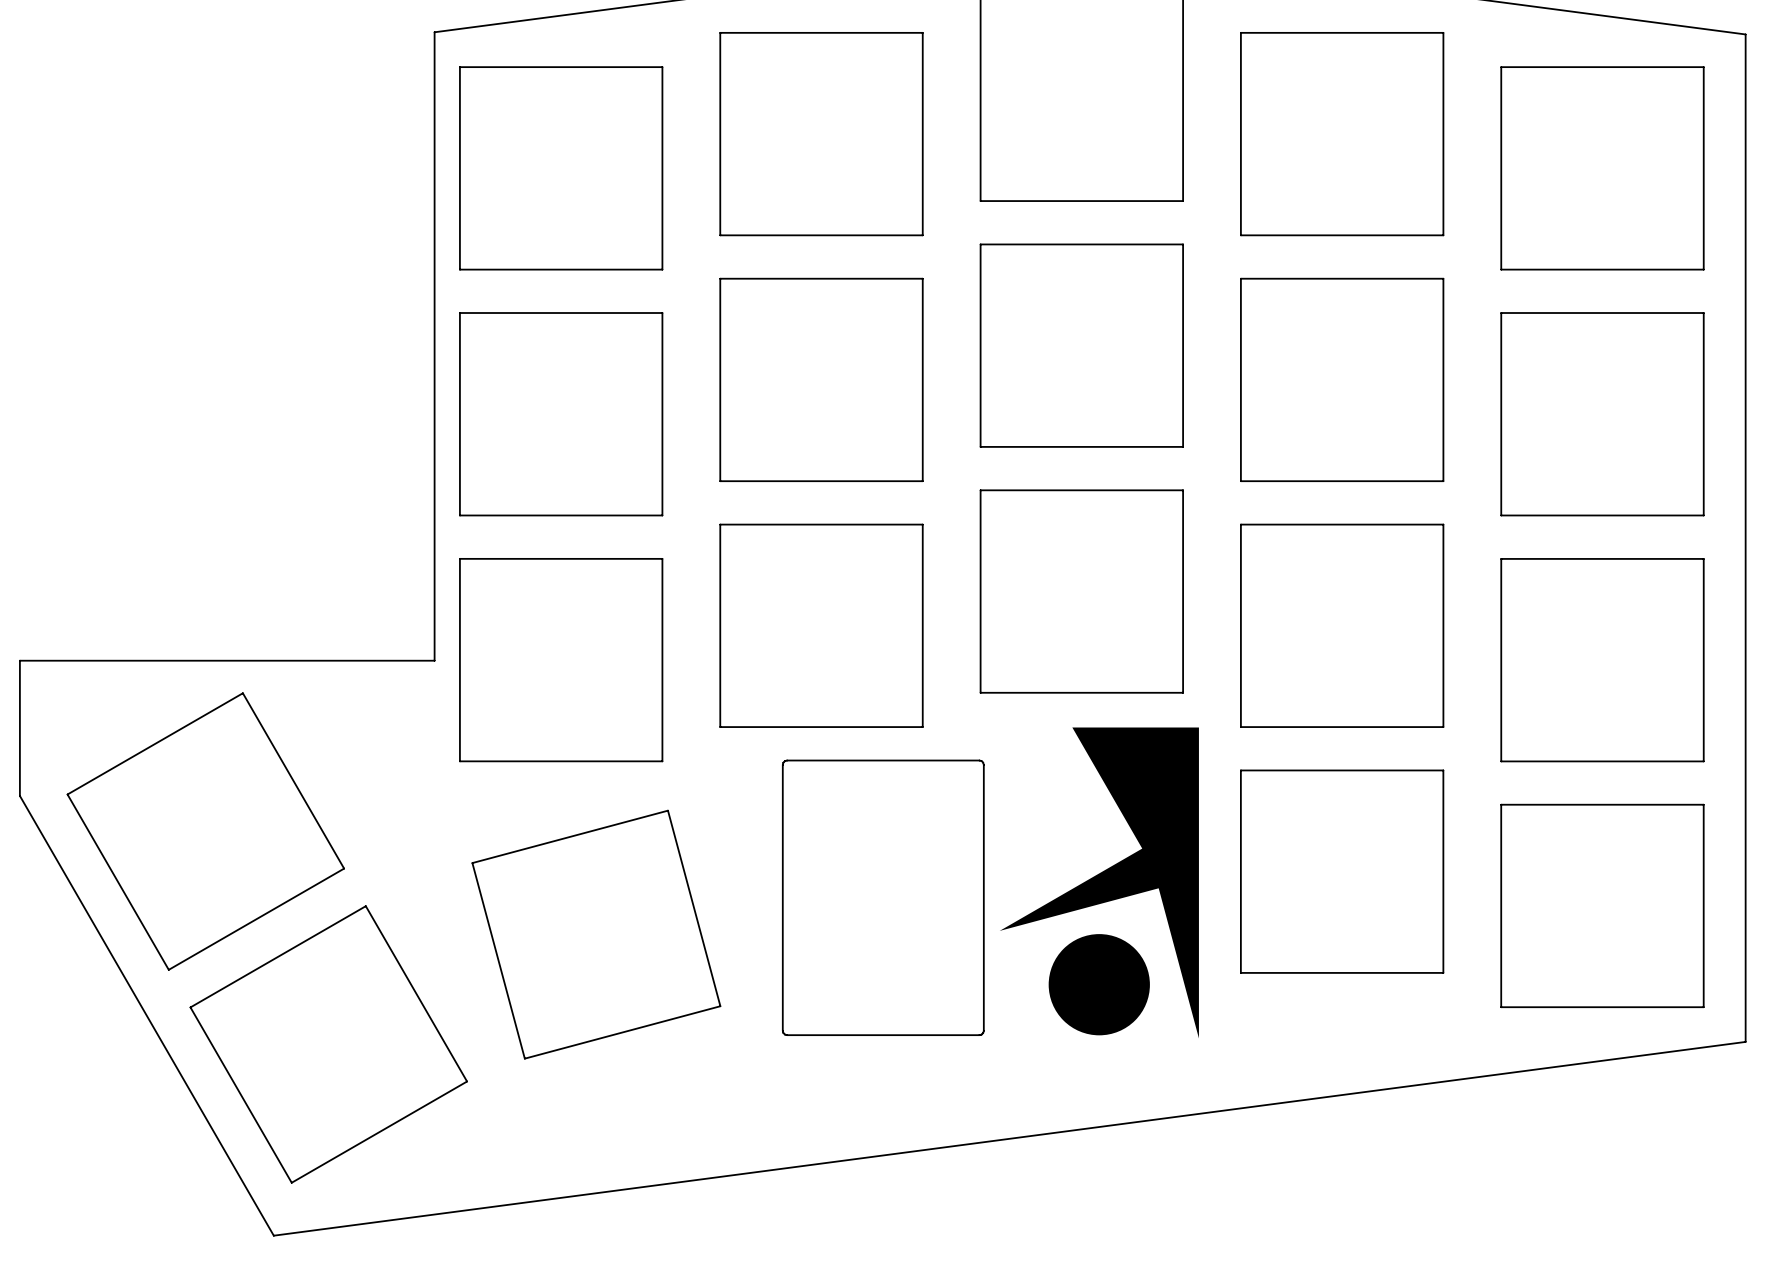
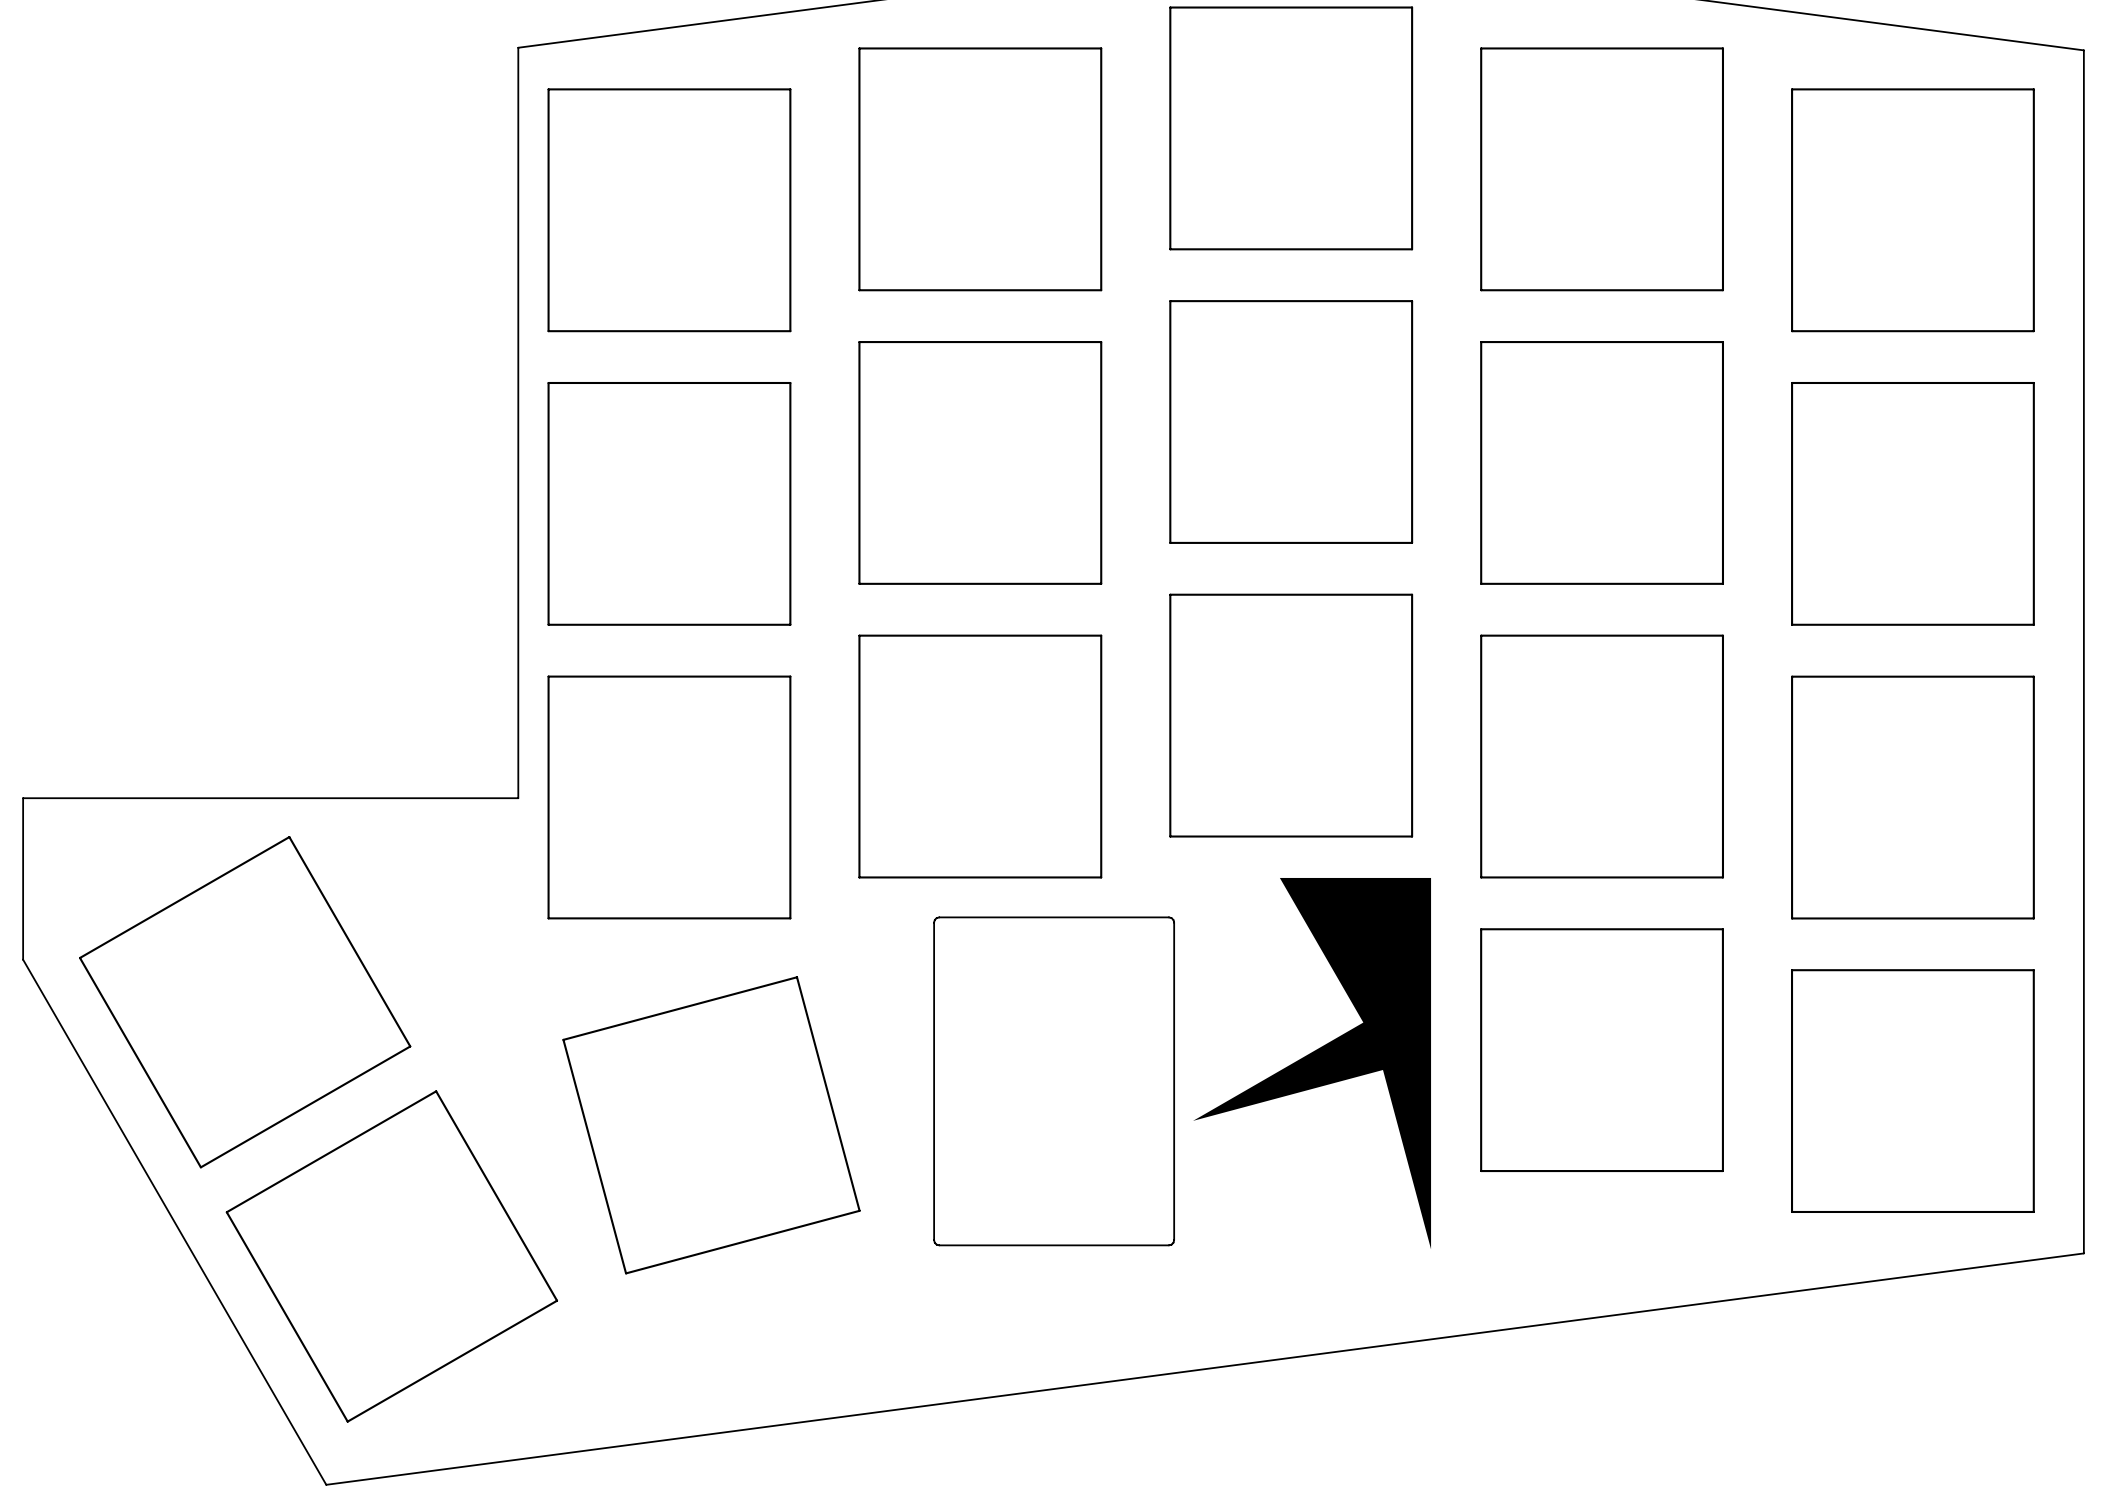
drawing: [1048, 934, 1150, 1036] -> none

